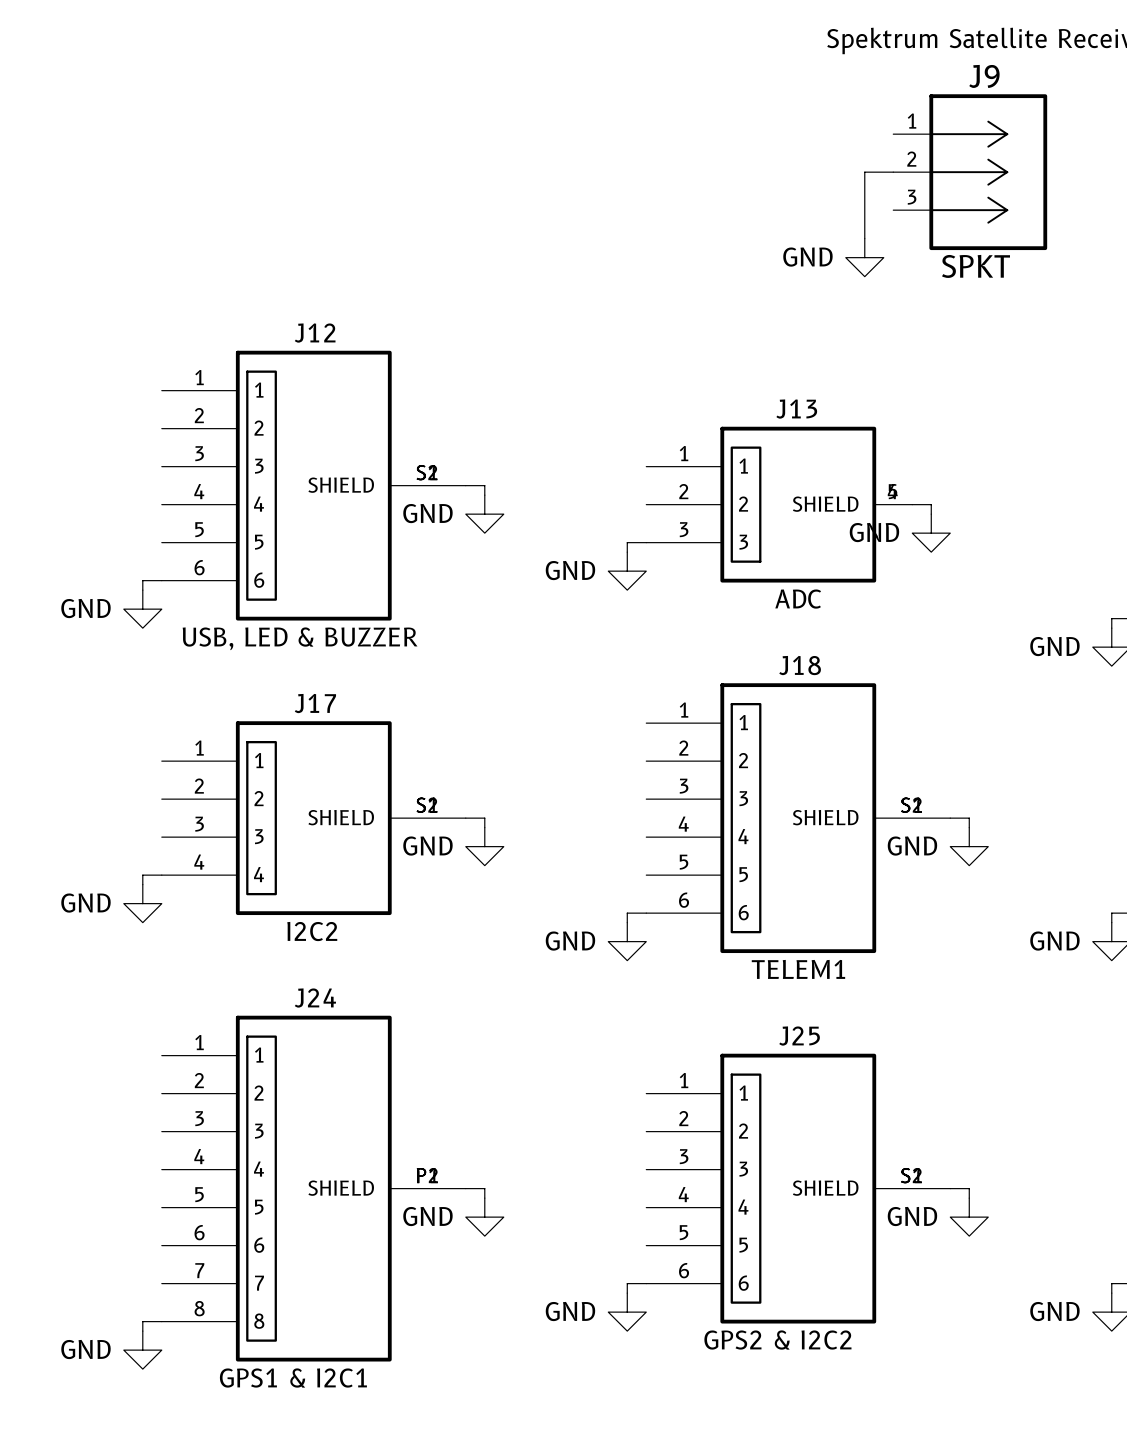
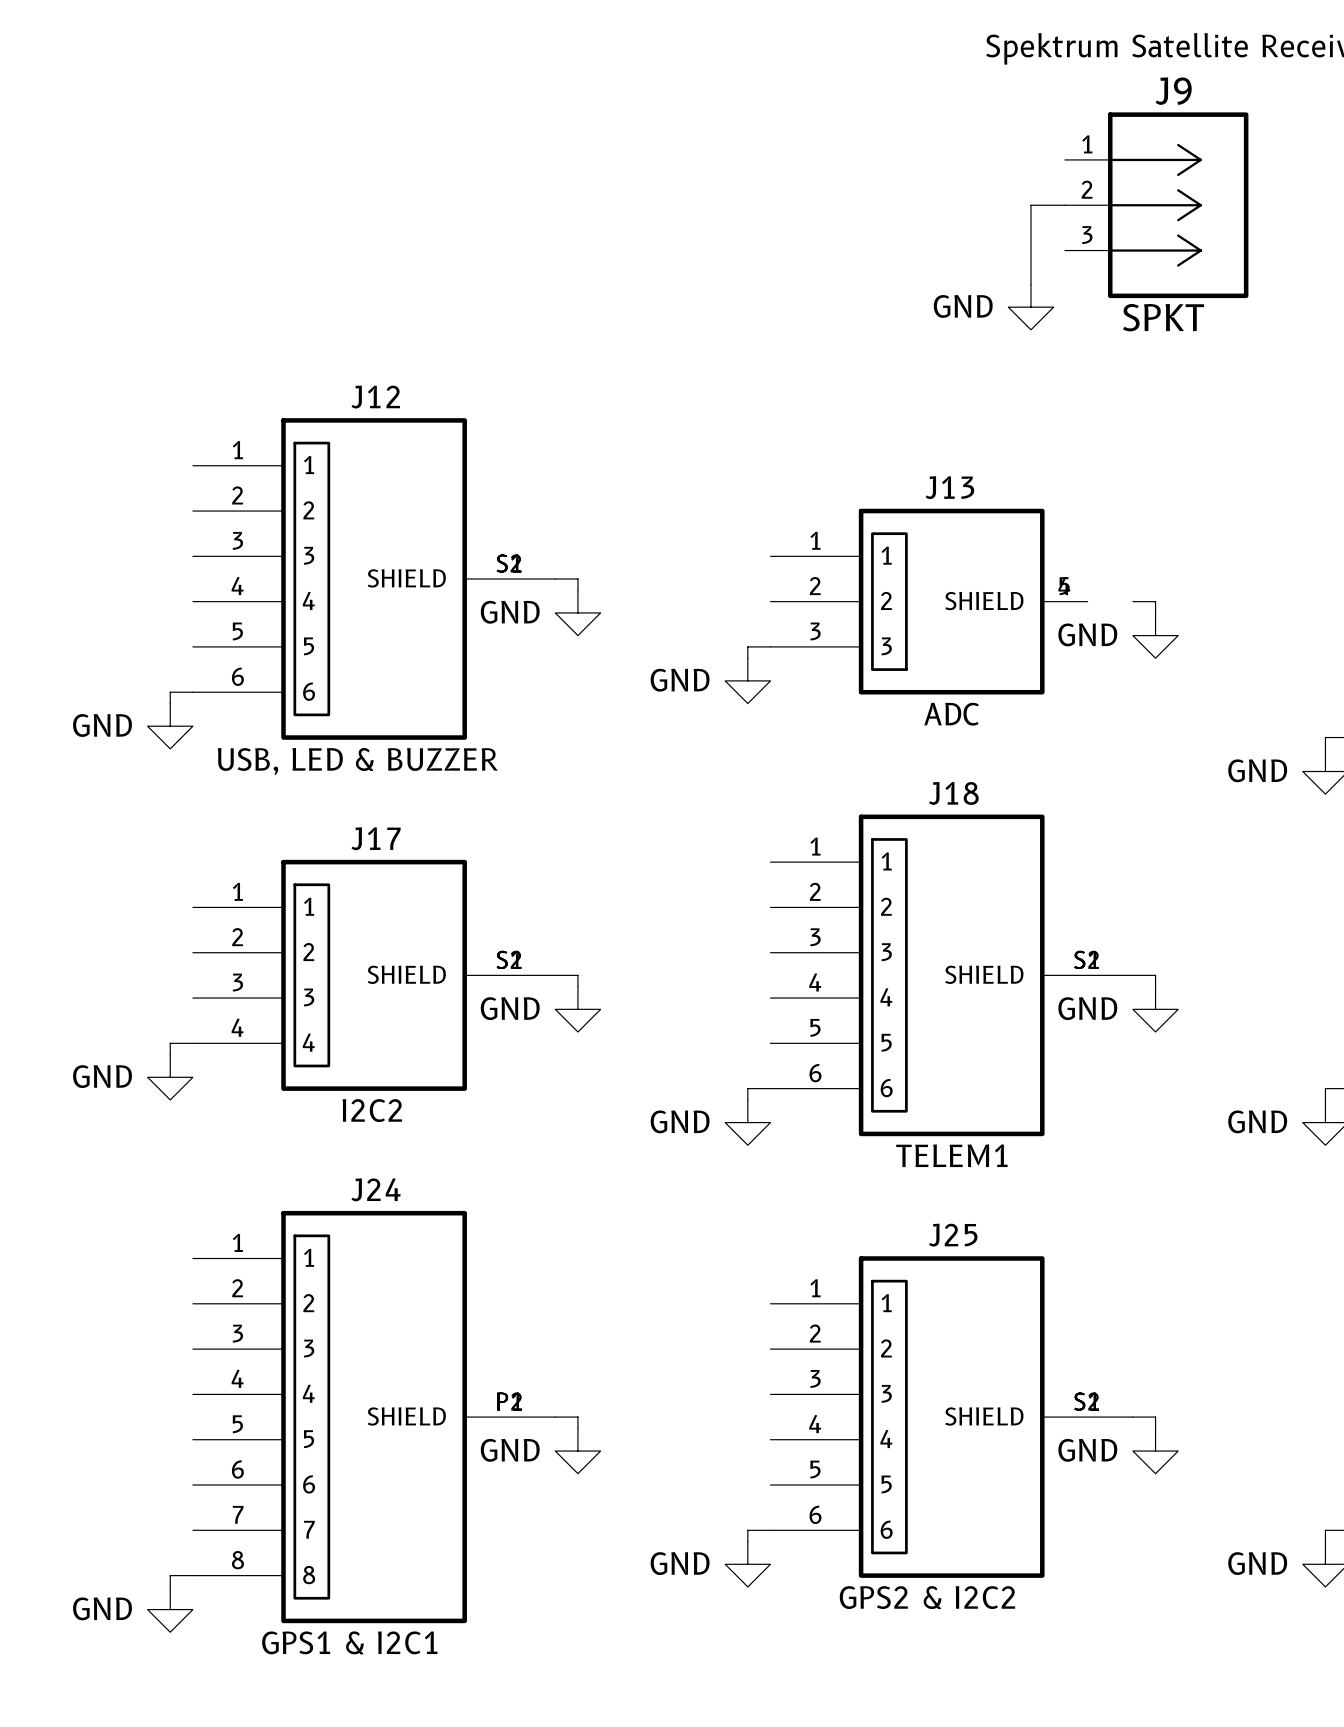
wire: (912, 504) (931, 504) (931, 514) -> (1132, 601) (1155, 601) (1155, 612)
power symbol position: GND (931, 533) -> GND (1155, 635)

